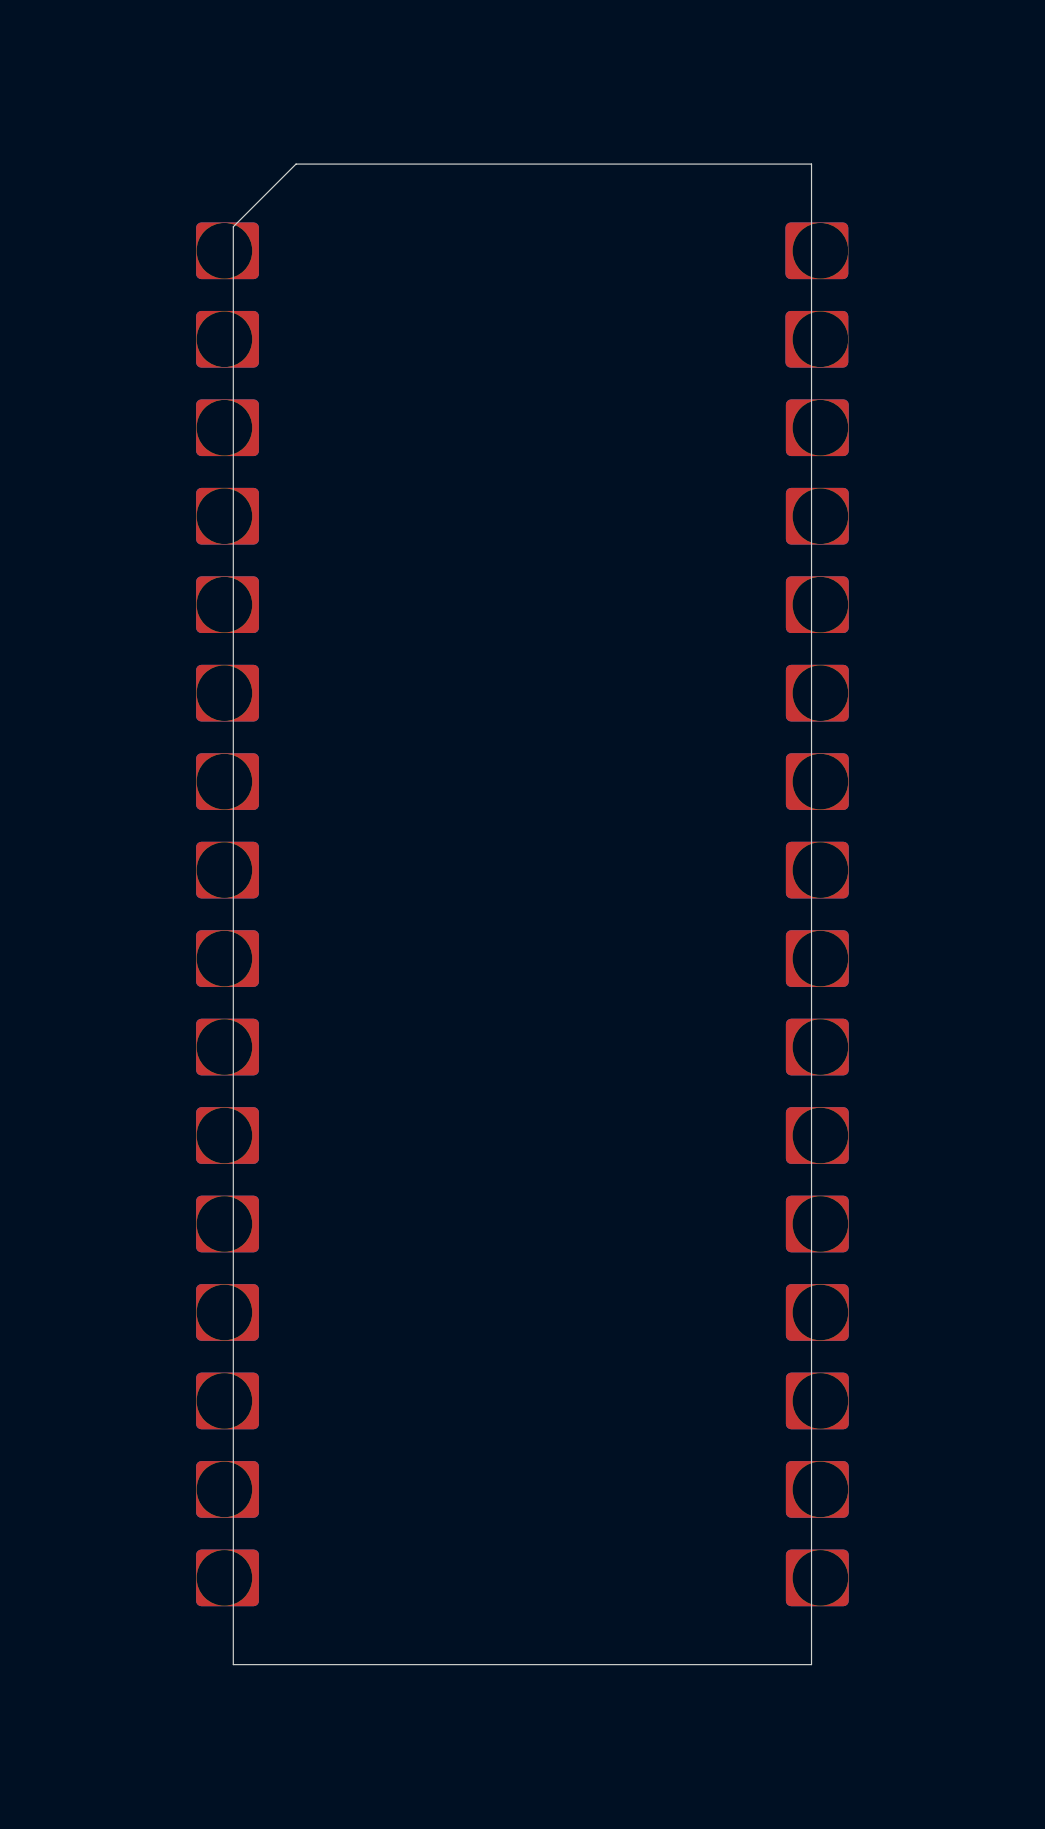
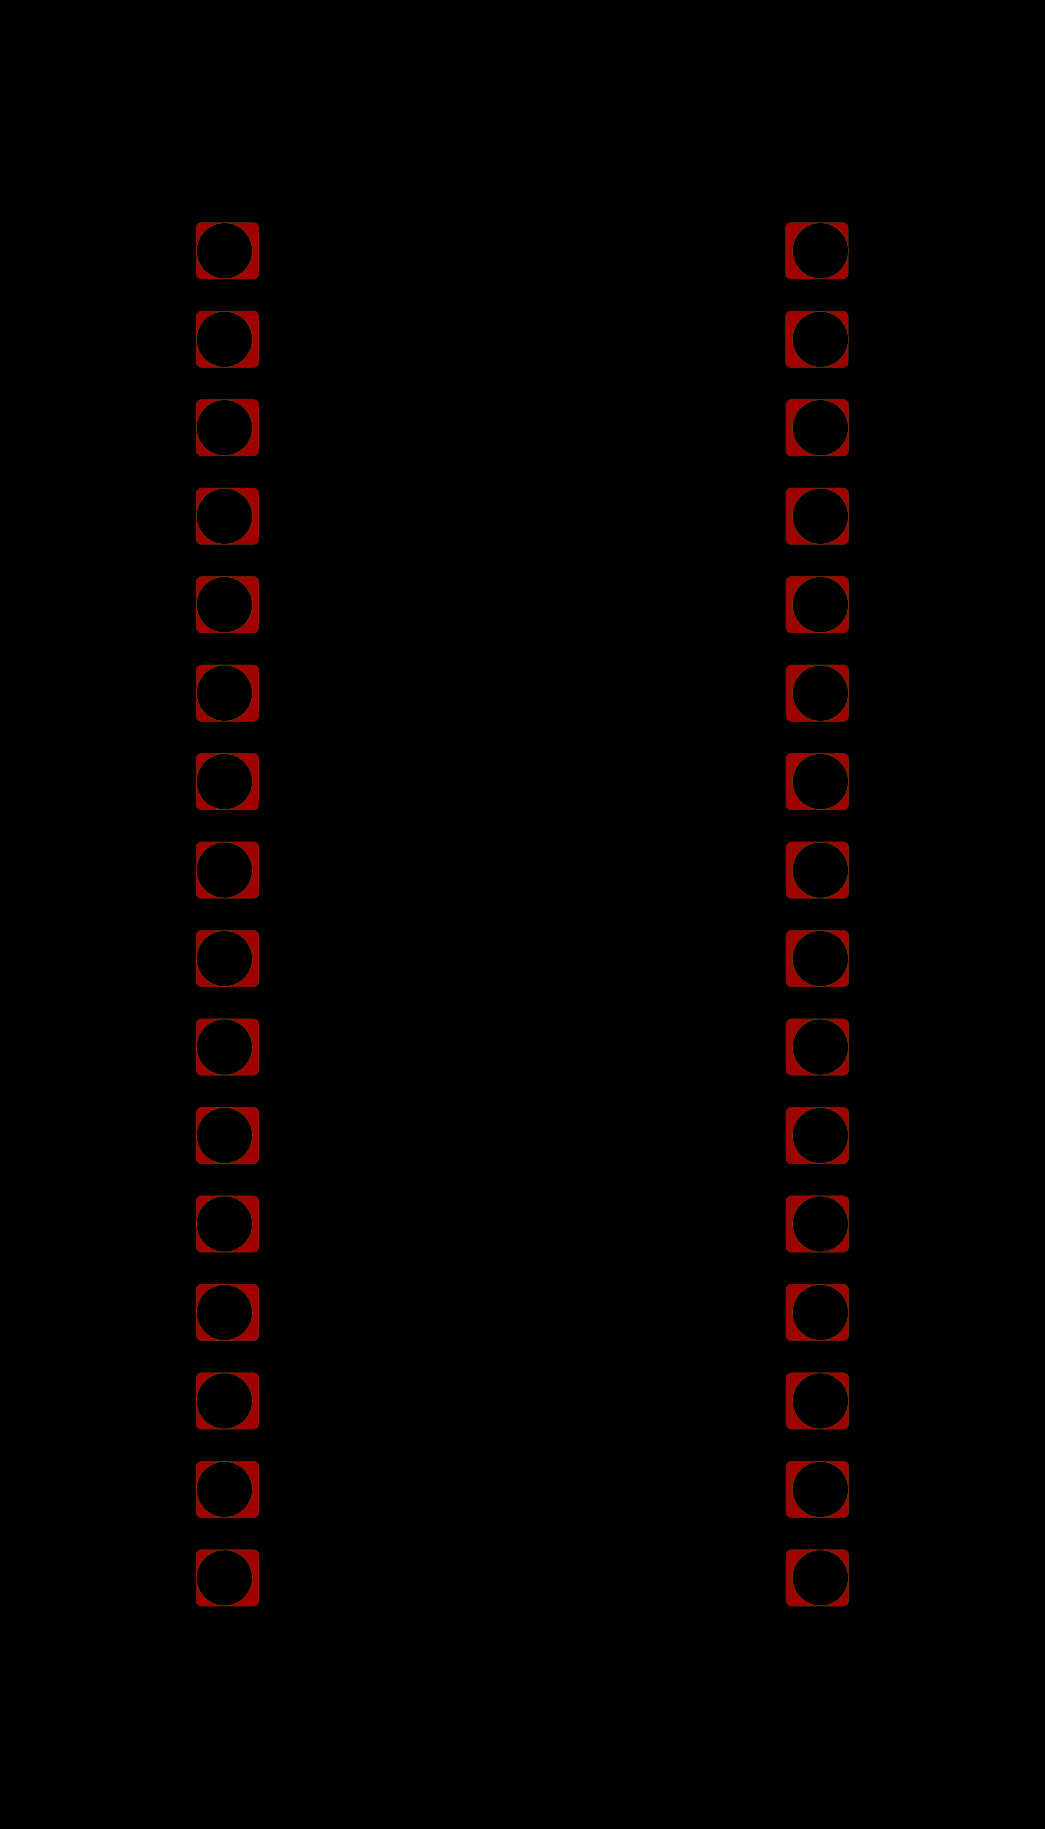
board edge: (296, 164) (233, 226) (233, 1664) (811, 1664) (811, 164) (296, 164) -> none

